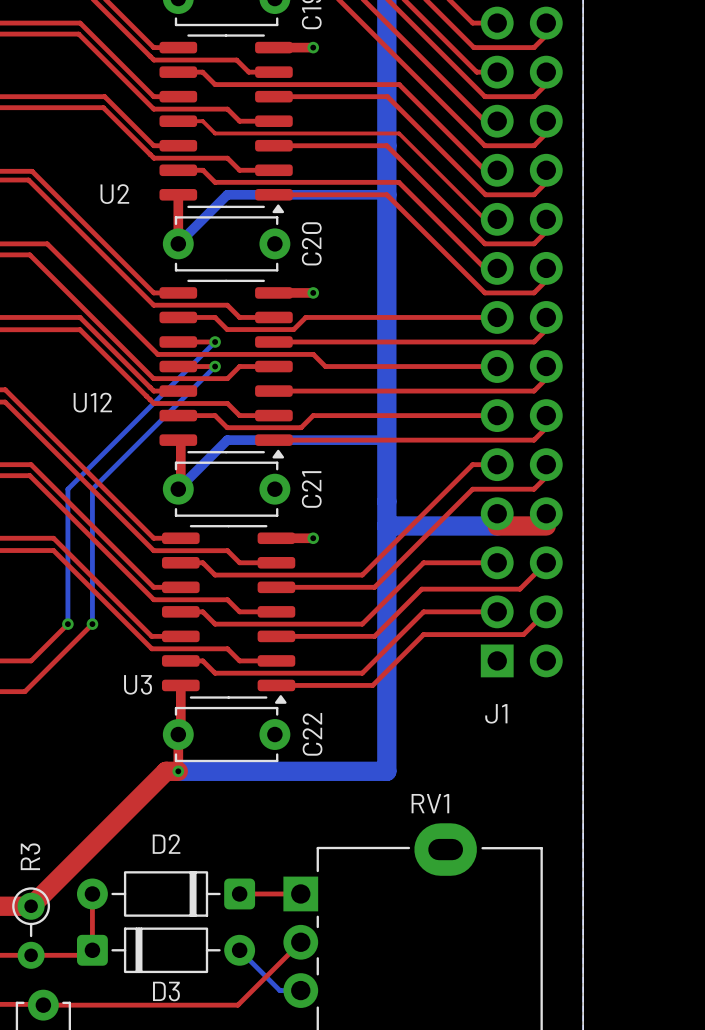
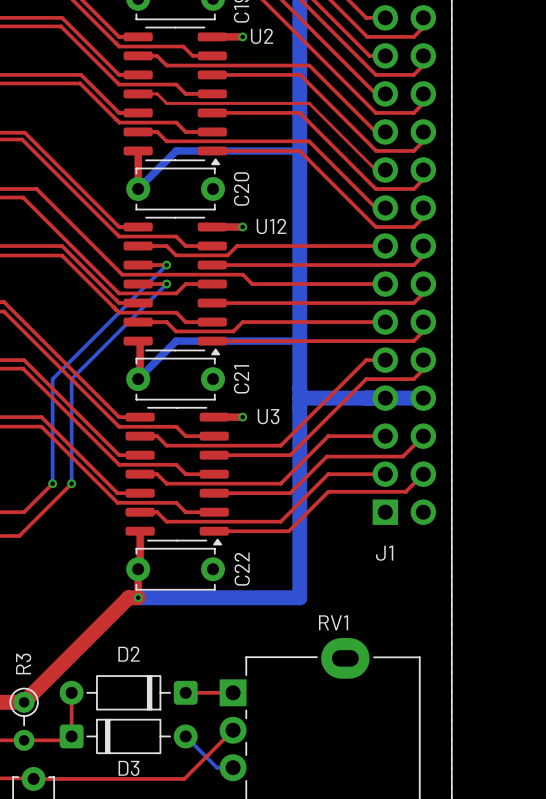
U2 name position: U2 (114, 194) -> U2 (262, 36)
U12 name position: U12 (92, 402) -> U12 (271, 226)
bottom track: none -> (299, 398) (423, 398)
bottom track: (386, 525) (497, 525) -> none
top track: (497, 525) (546, 525) -> none
U3 name position: U3 (138, 684) -> U3 (268, 416)

